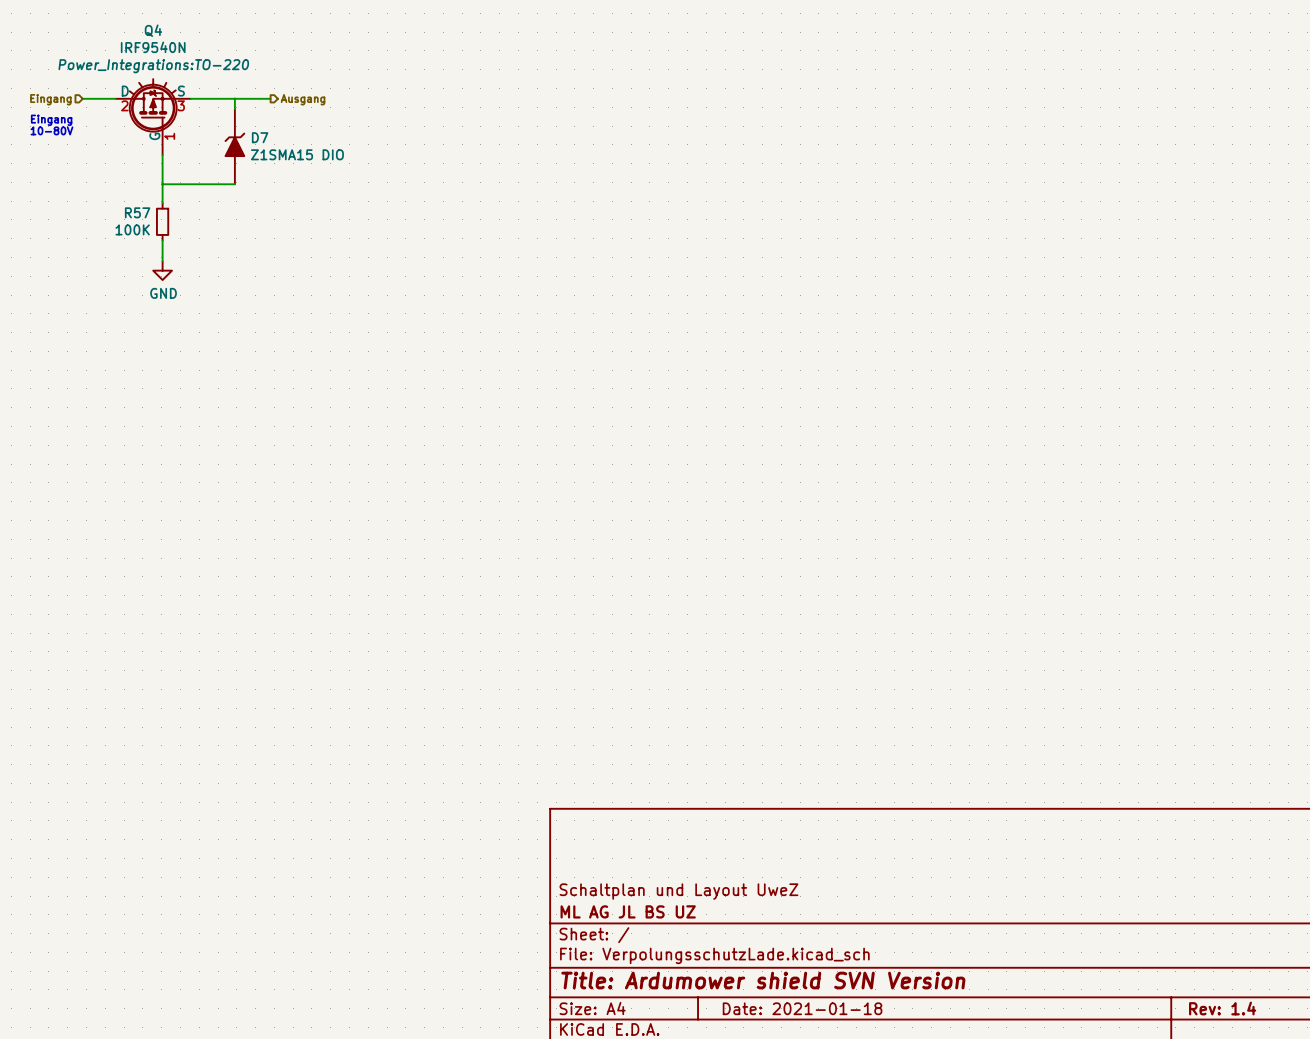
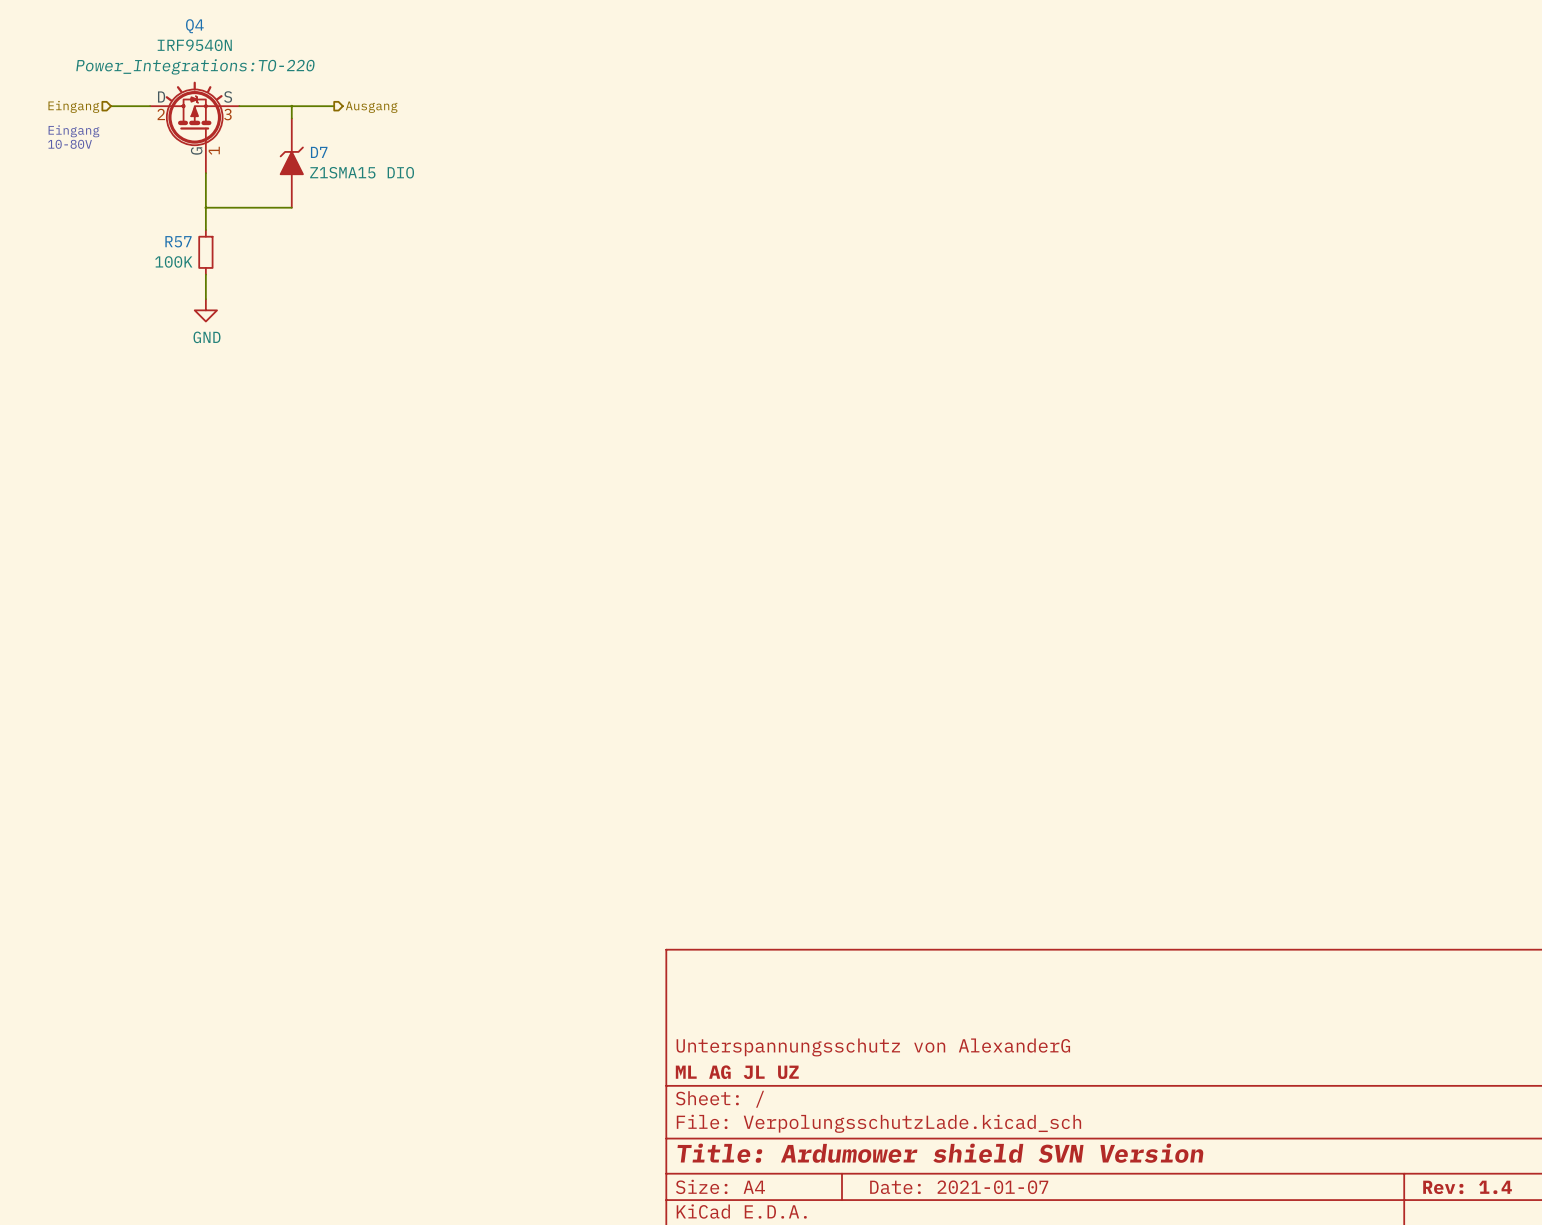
title block: Schaltplan und Layout UweZ (678, 891) -> Unterspannungsschutz von AlexanderG (873, 1047)
title block: ML AG JL BS UZ (628, 911) -> ML AG JL UZ (737, 1072)
title block: Date: 2021-01-18 (802, 1008) -> Date: 2021-01-07 (959, 1187)

